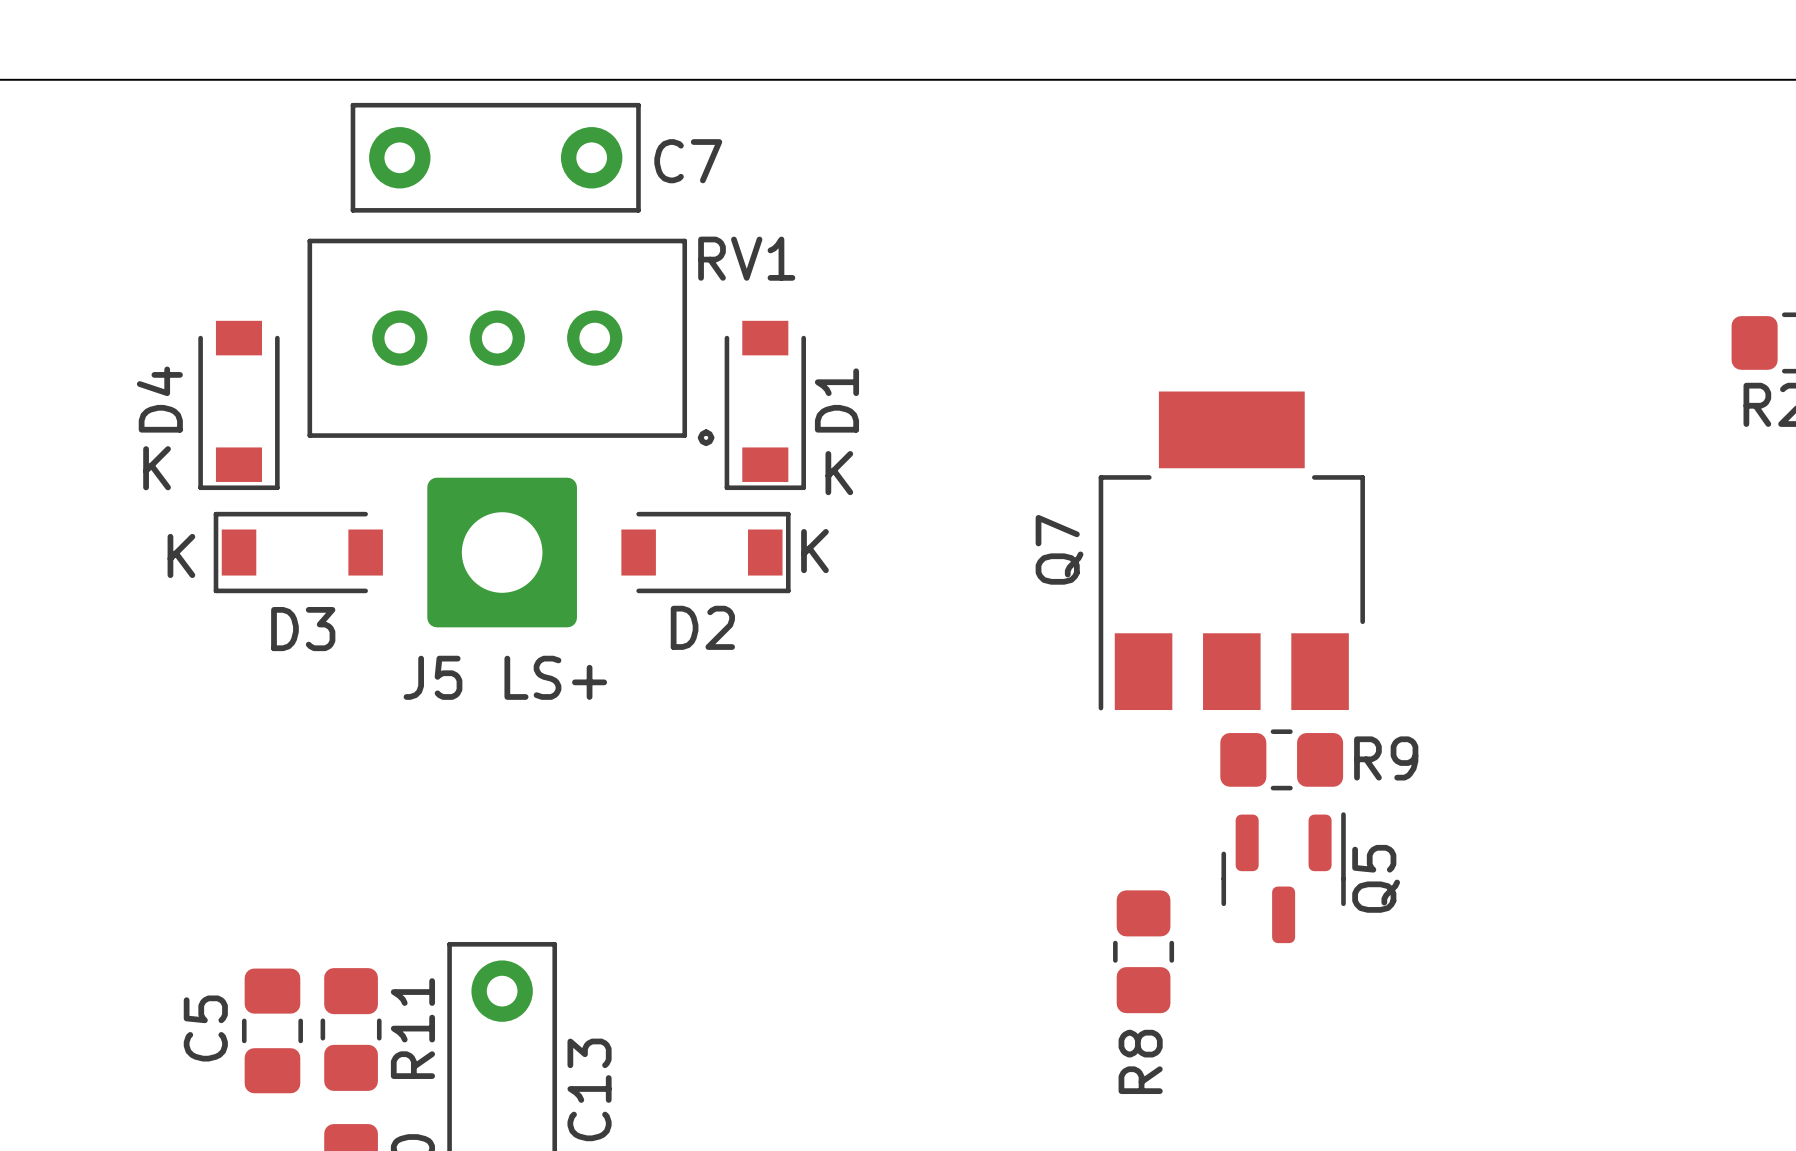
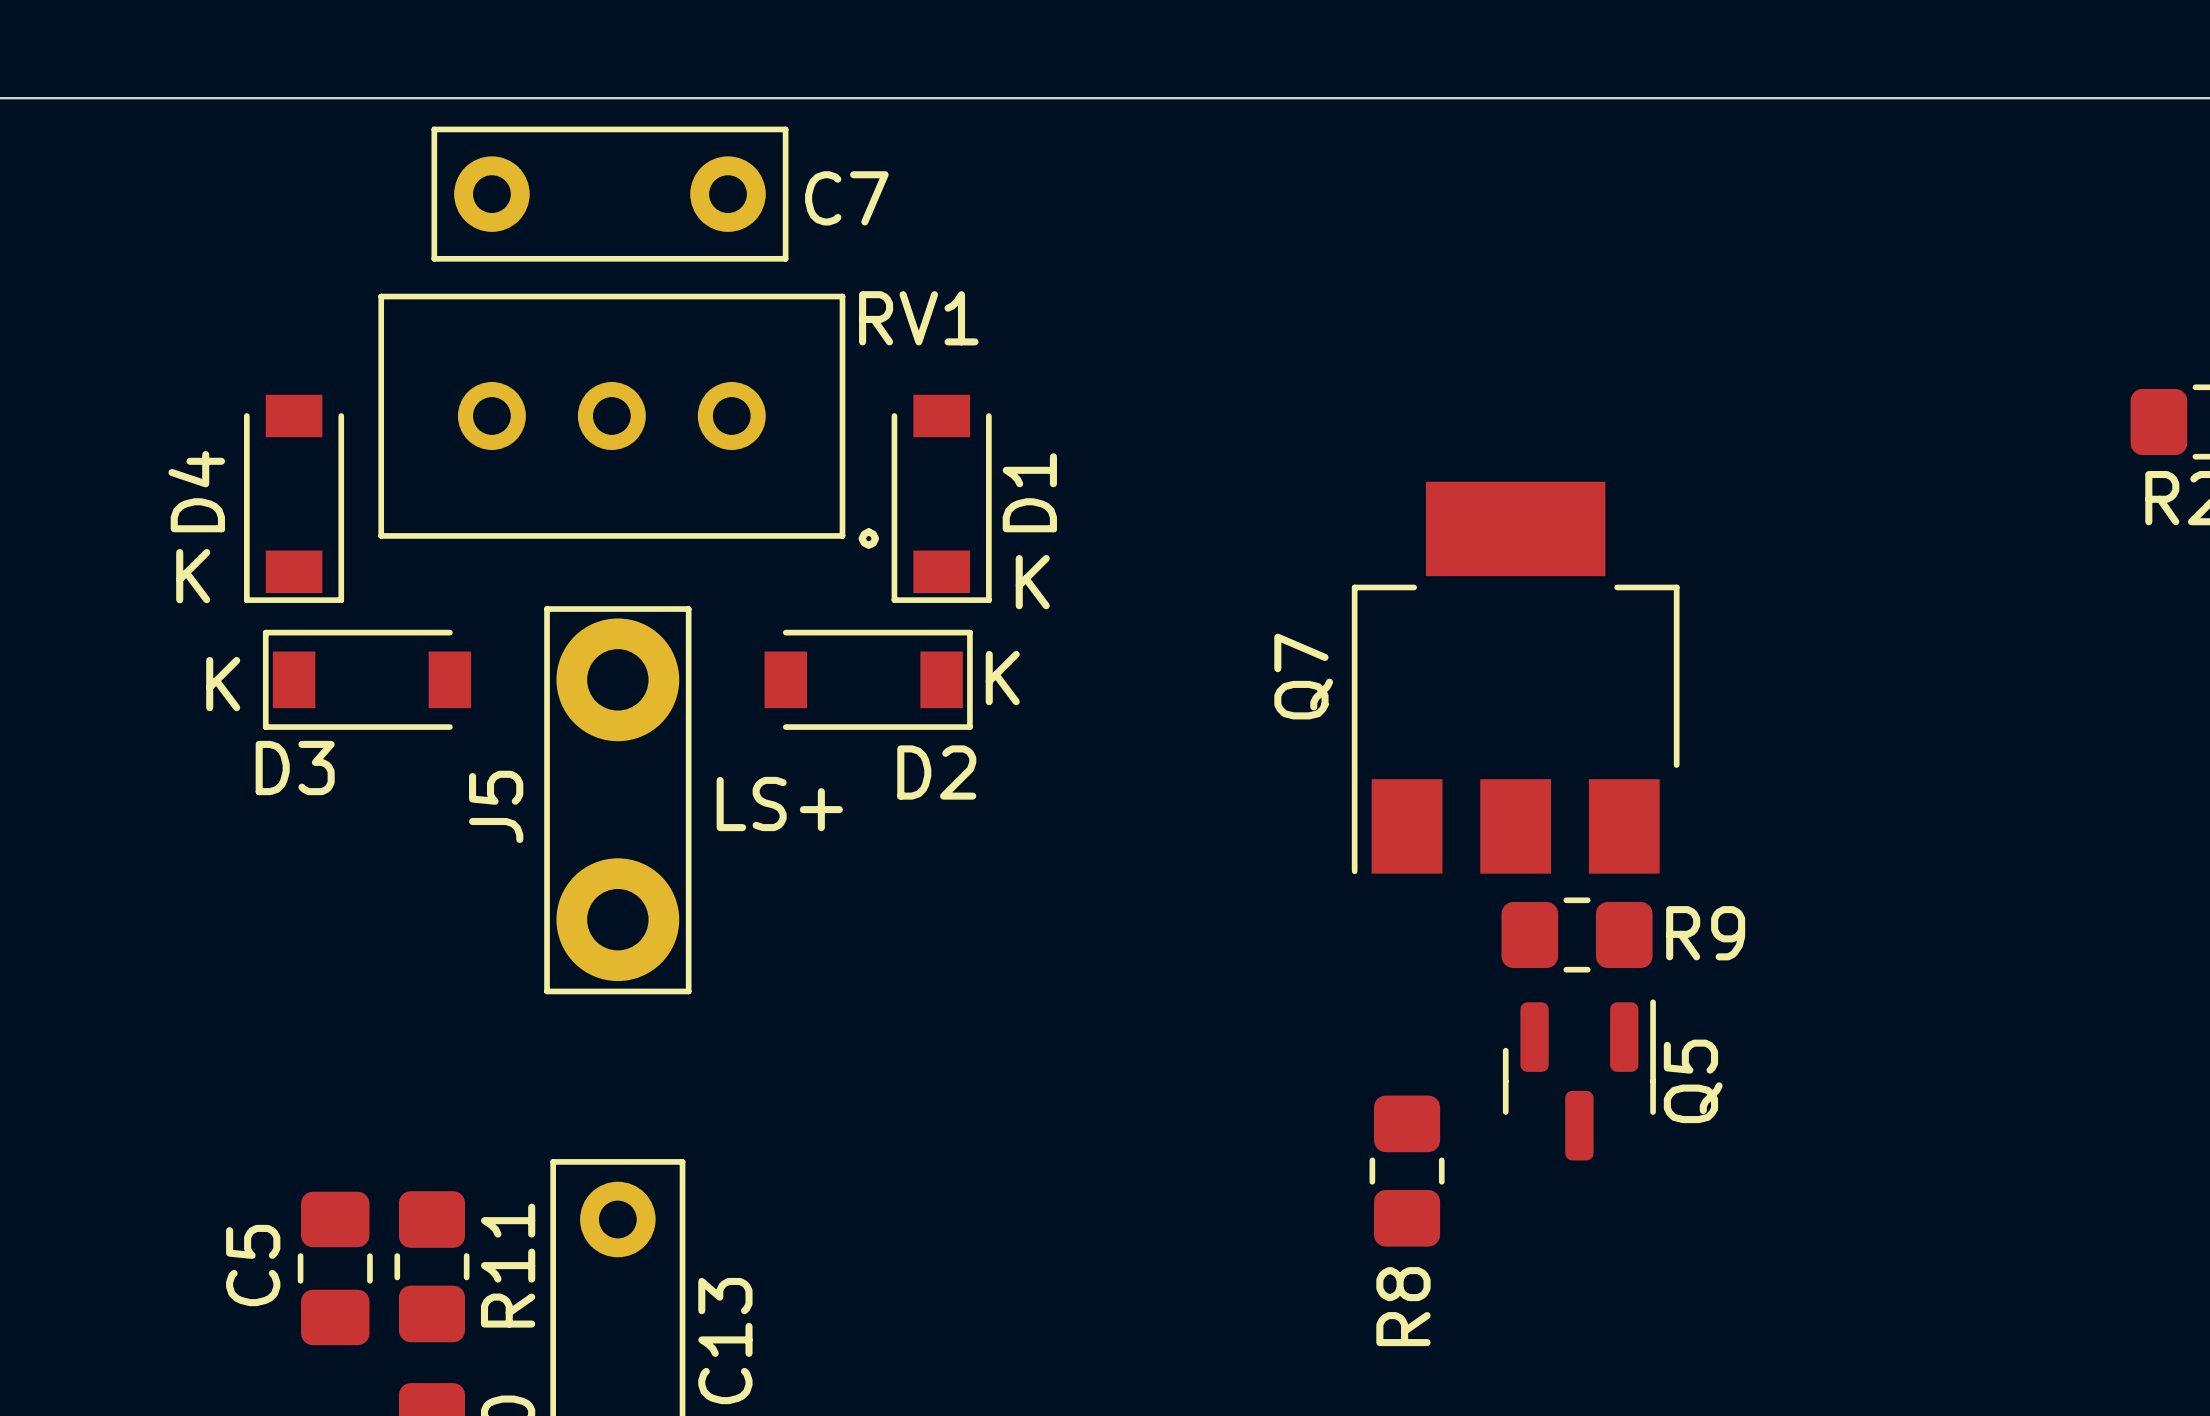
J5 footprint: [427, 477, 577, 628] -> [544, 606, 692, 995]
D2 name position: D2 (702, 627) -> D2 (936, 772)
D3 name position: D3 (303, 629) -> D3 (295, 768)
J5 name position: J5 (433, 677) -> J5 (496, 806)
text position: LS+ (555, 677) -> LS+ (779, 804)

